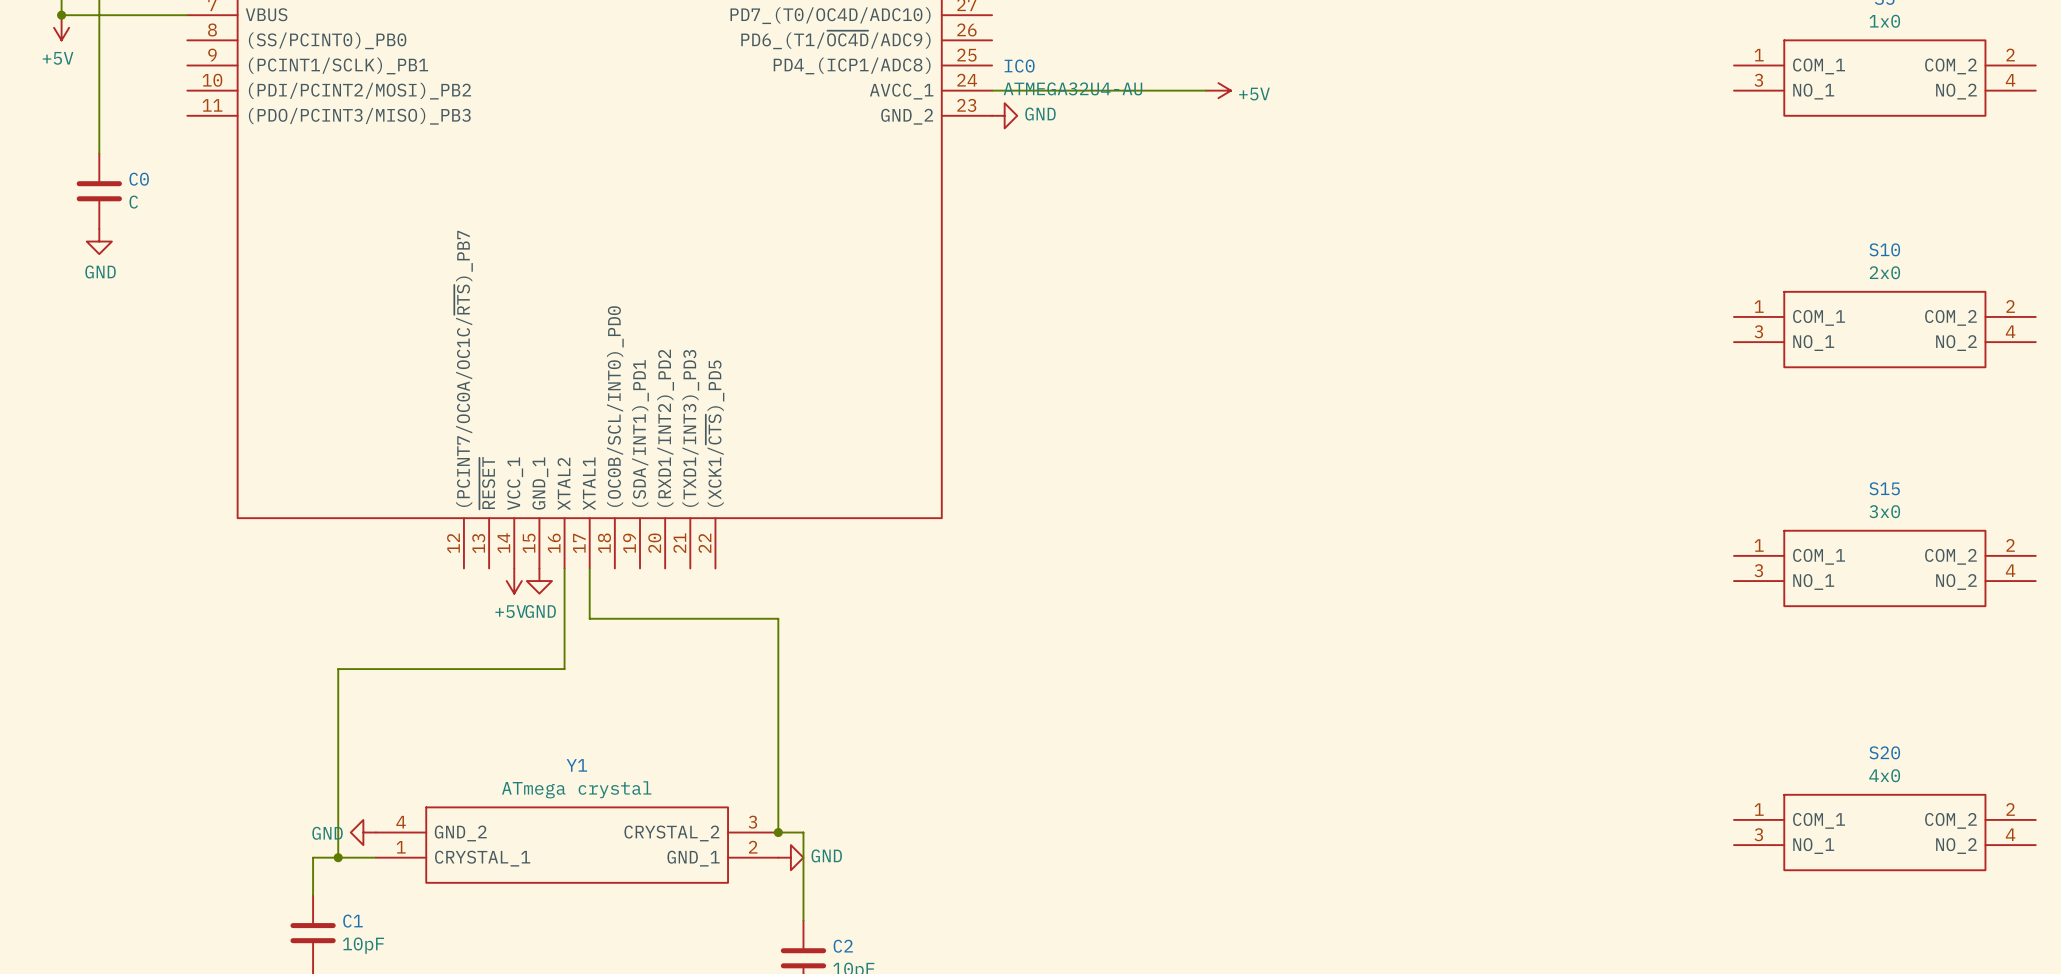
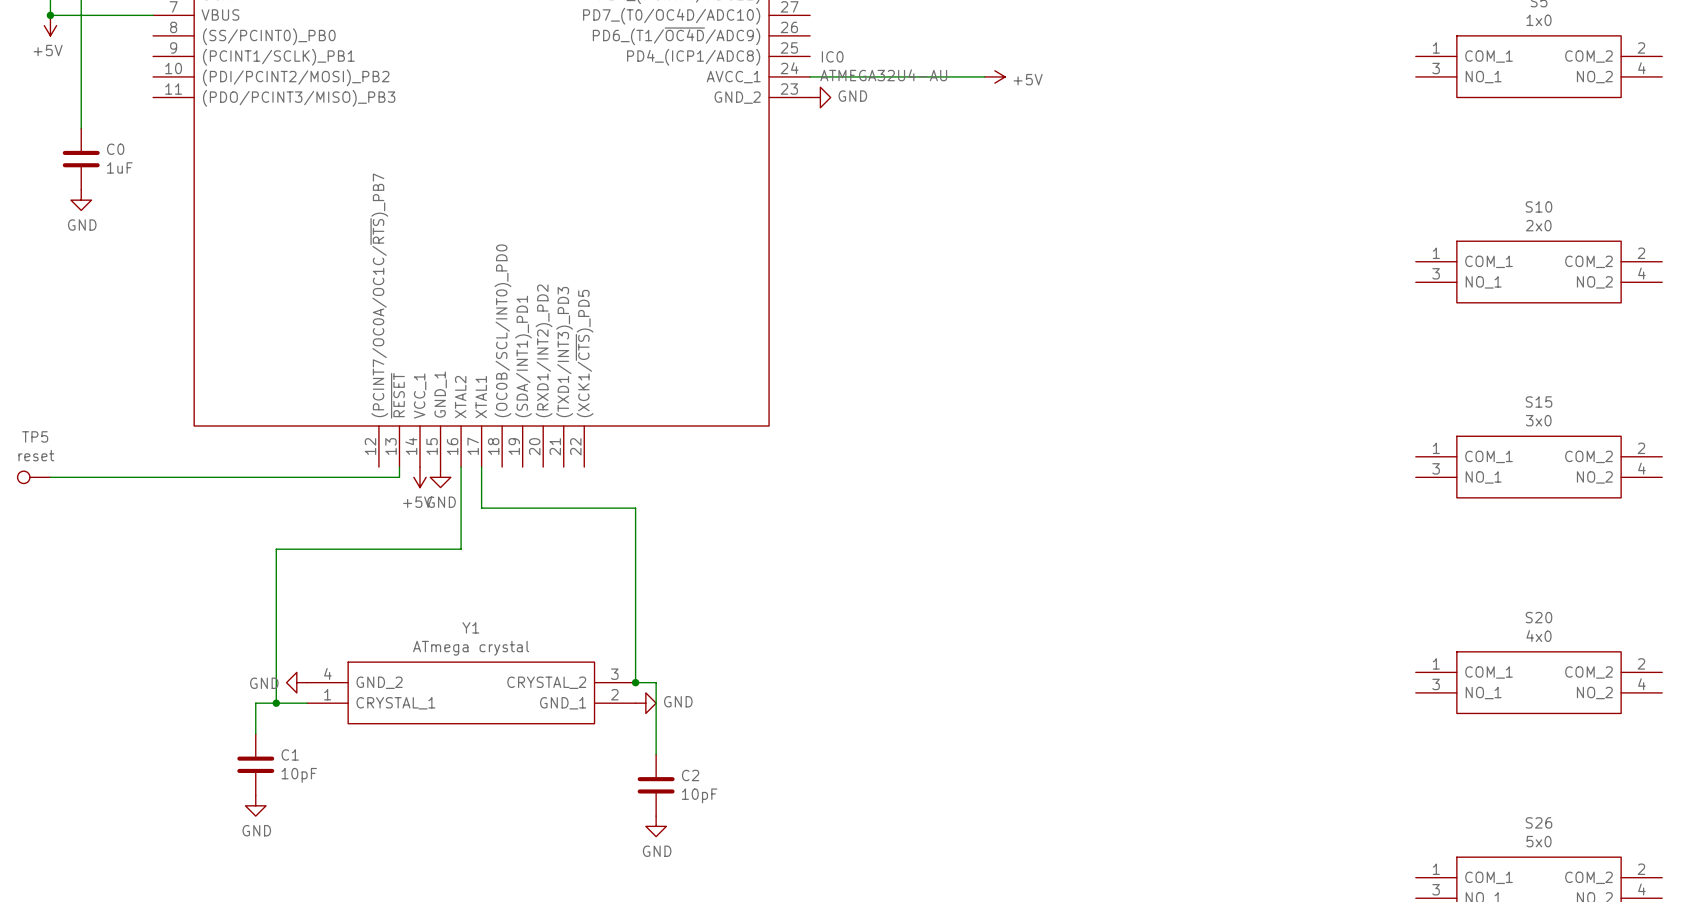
C0 value: C (133, 202) -> 1uF (119, 167)
wire: none -> (399, 467) (399, 477) (50, 477)
TP5: none -> reset (34, 477)

